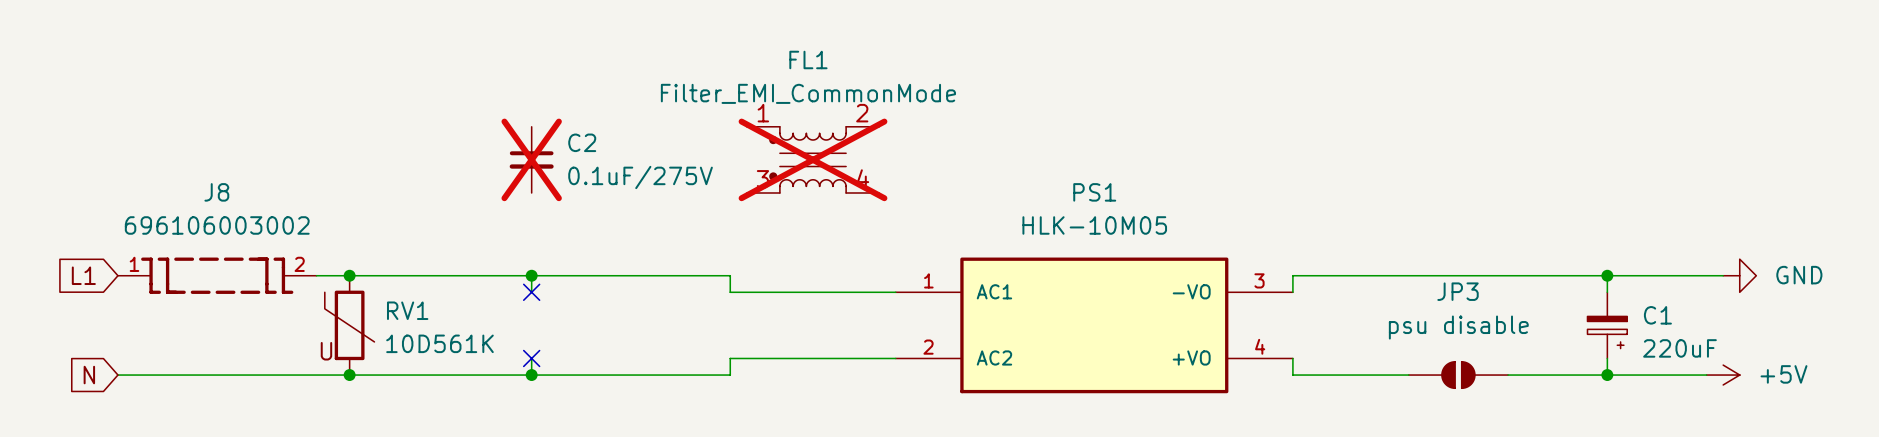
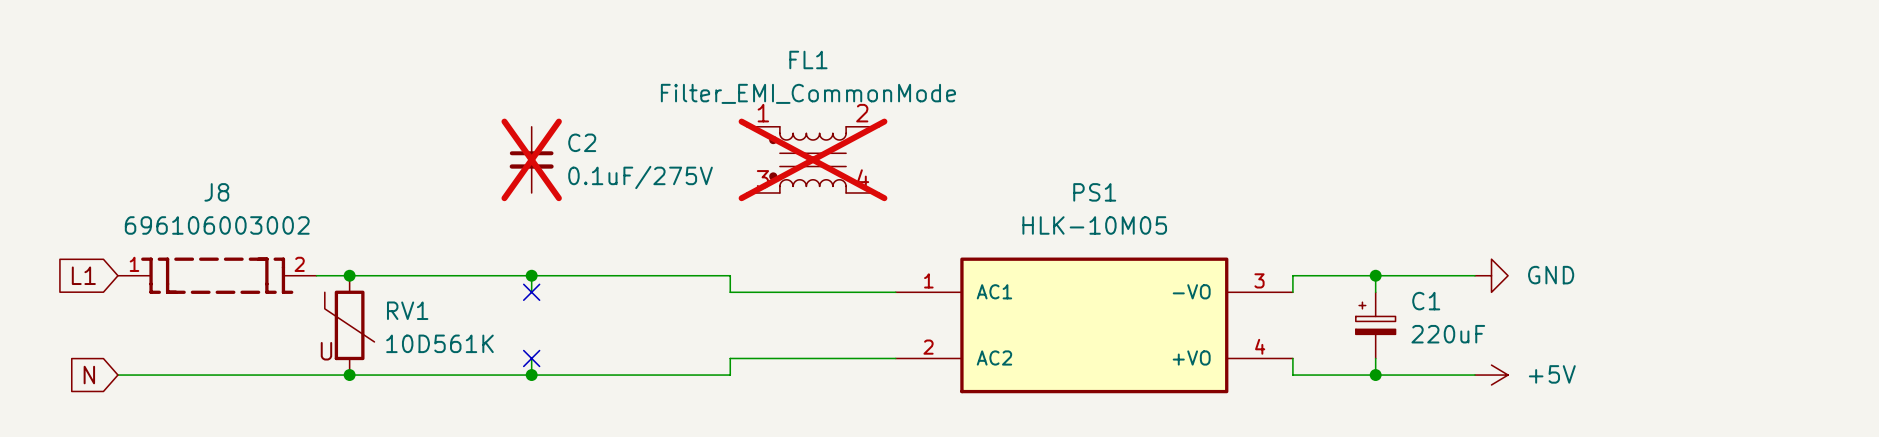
junction: none -> (1375, 275)
wire: (1474, 275) (1723, 275) -> none
wire: (1607, 275) (1607, 292) -> (1375, 275) (1375, 292)
junction: (1607, 275) -> none
power symbol position: GND (1739, 275) -> GND (1491, 275)
C1 position: (1607, 325) -> (1375, 325)
C1 rotation: 0° (1607, 332) -> 180° (1375, 318)
wire: (1607, 358) (1607, 375) -> (1375, 358) (1375, 375)
junction: none -> (1375, 375)
JP3: psu disable (1458, 375) -> none
wire: (1508, 375) (1706, 375) -> none
junction: (1607, 375) -> none
power symbol position: +5V (1723, 375) -> +5V (1491, 375)

